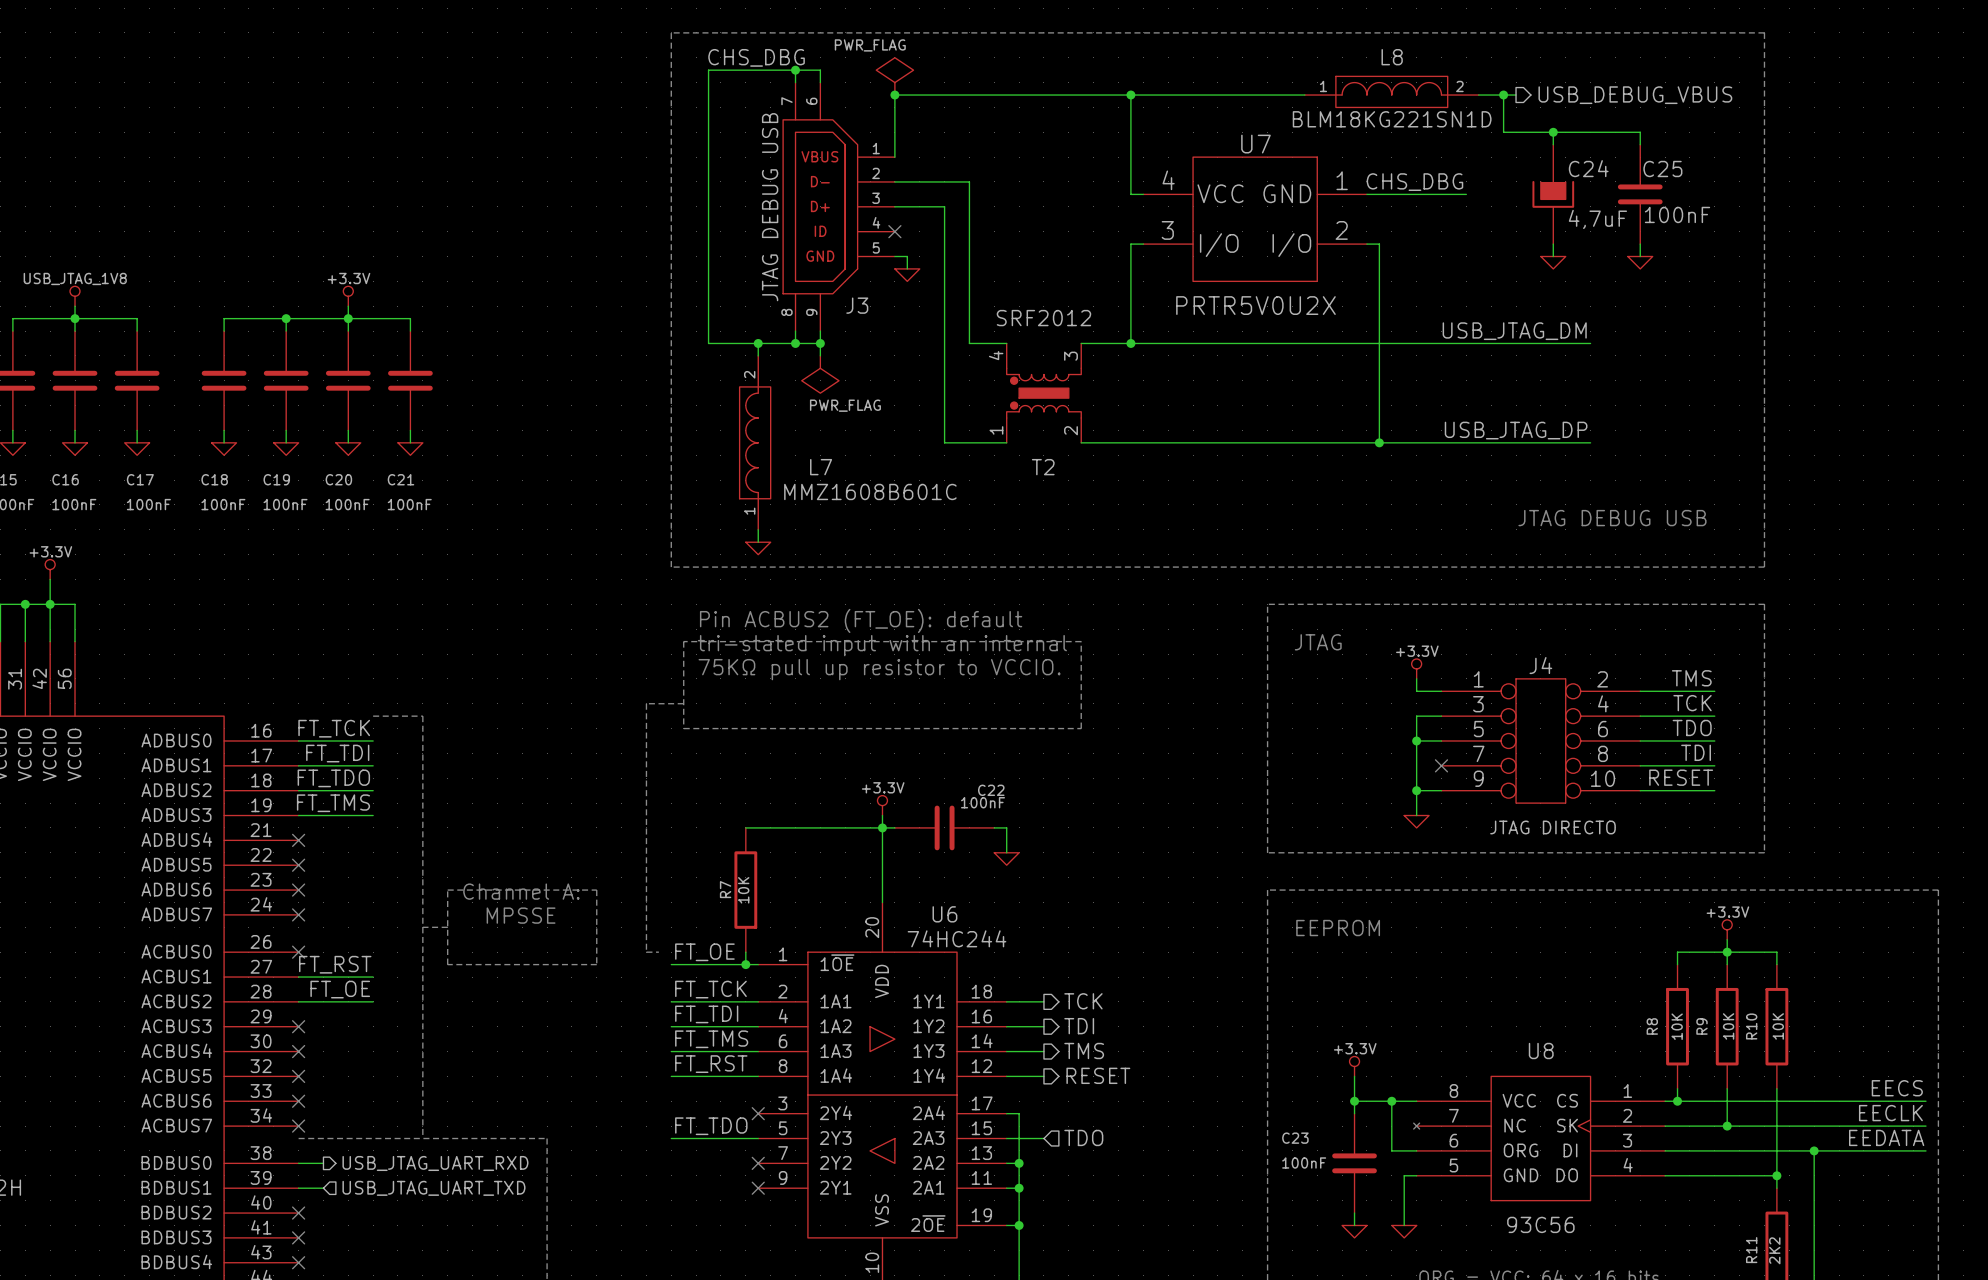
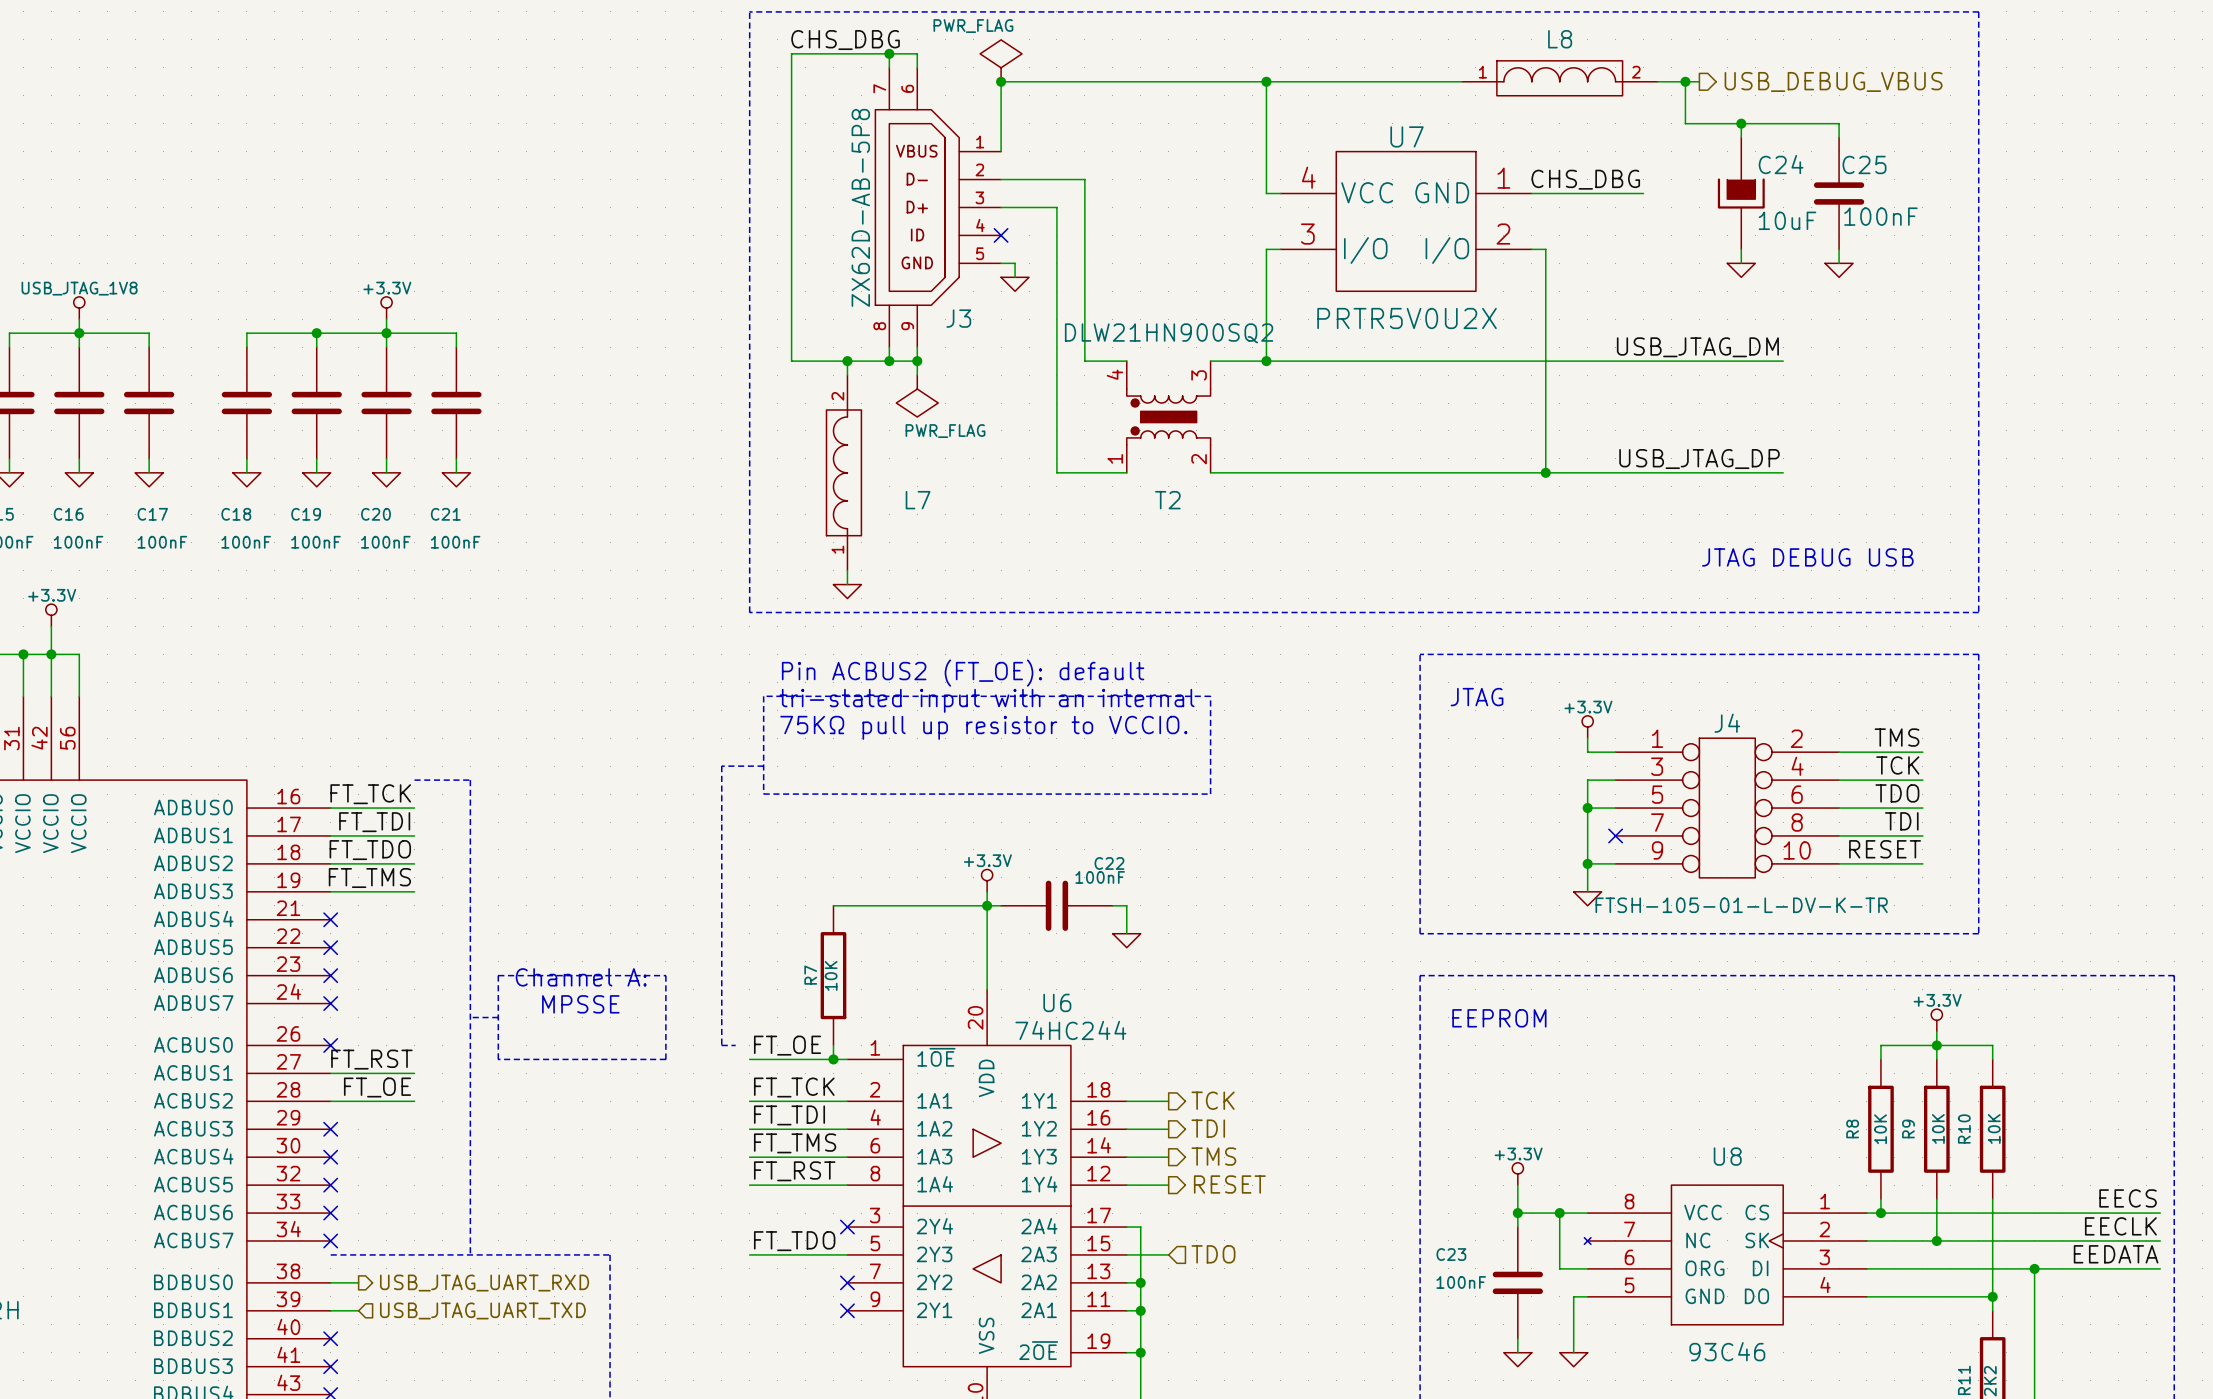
L8 value: BLM18KG221SN1D (1392, 119) -> none
J3 value: JTAG DEBUG USB (770, 207) -> ZX62D-AB-5P8 (860, 207)
C24 value: 4,7uF (1597, 219) -> 10uF (1787, 220)
T2 value: SRF2012 (1043, 318) -> DLW21HN900SQ2 (1169, 333)
L7 value: MMZ1608B601C (870, 491) -> none
J4 value: JTAG DIRECTO (1553, 827) -> FTSH-105-01-L-DV-K-TR (1741, 905)
U8 value: 93C56 (1540, 1224) -> 93C46 (1727, 1351)

